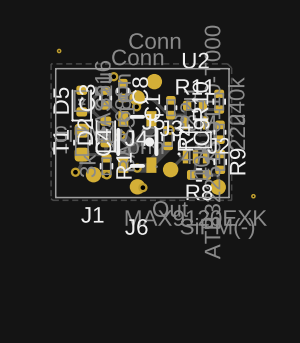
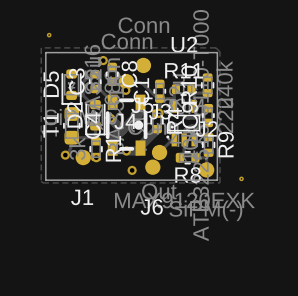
J6 position: (137, 186) -> (152, 167)

